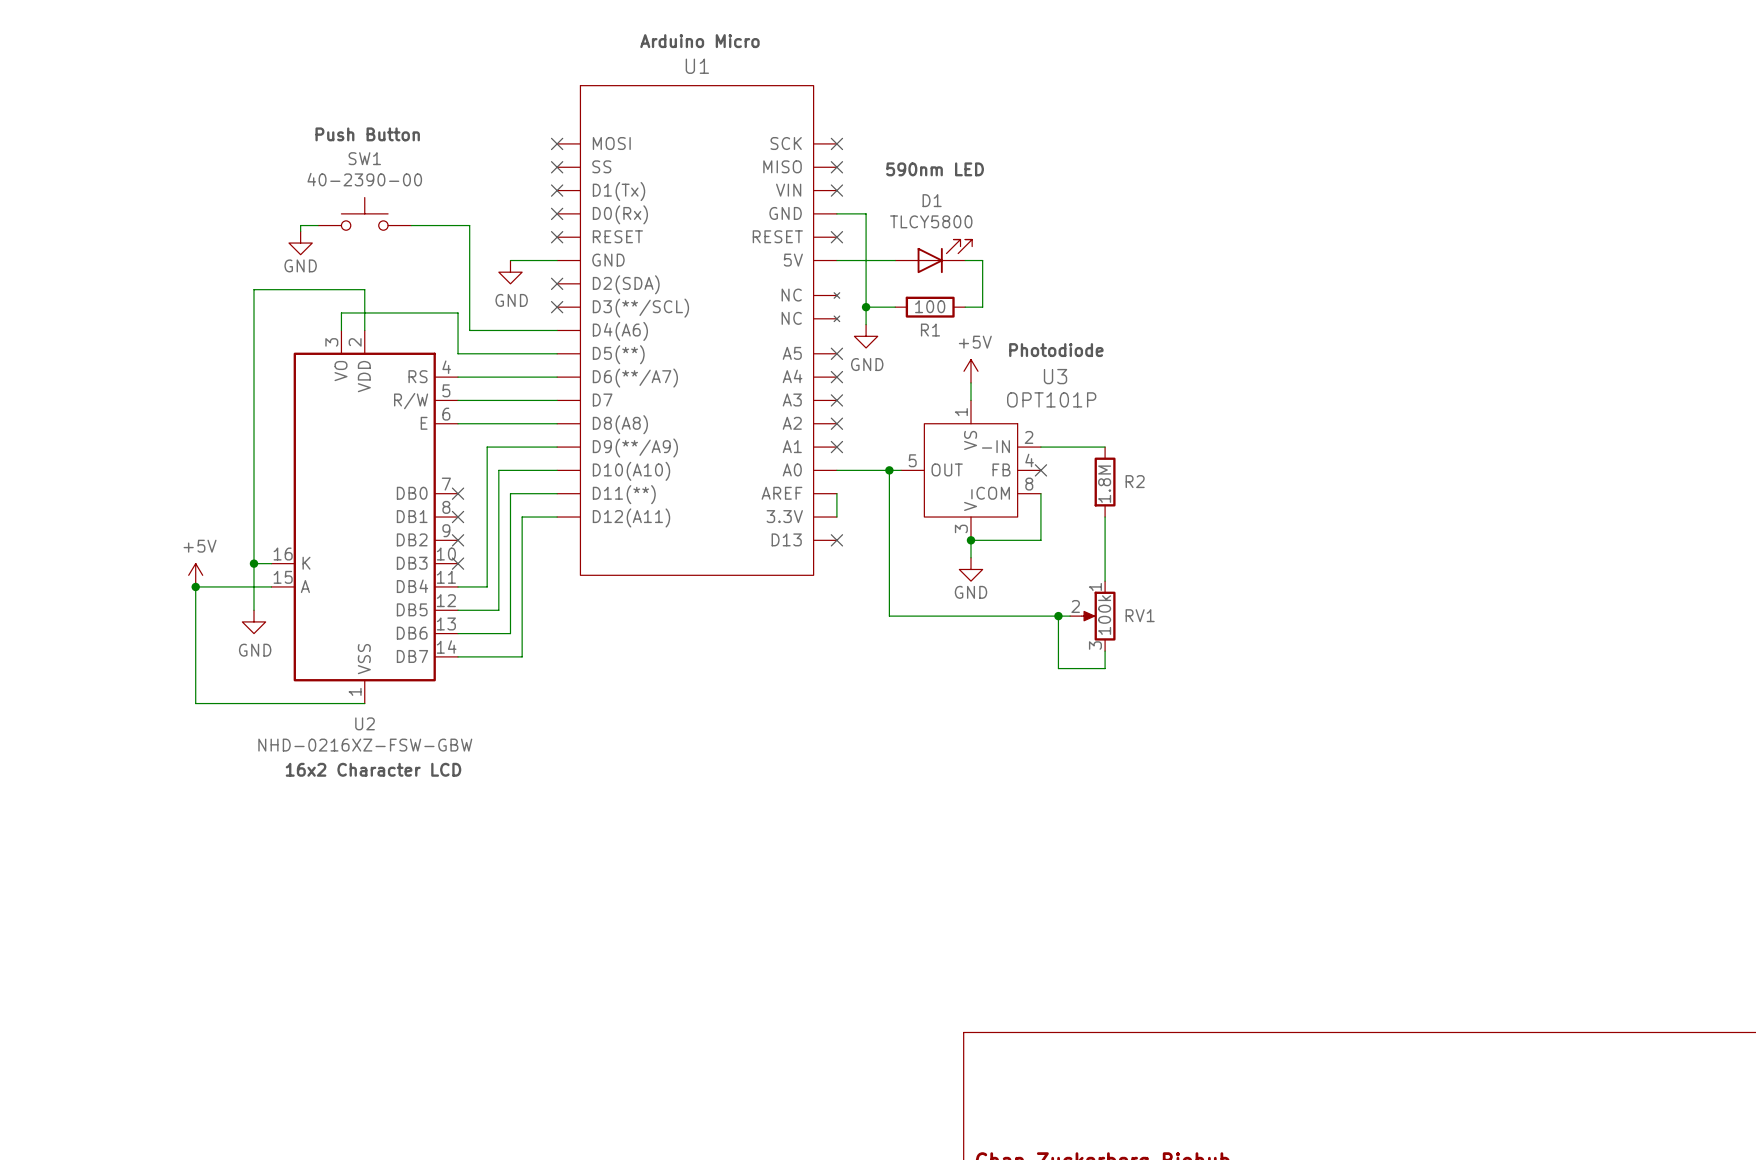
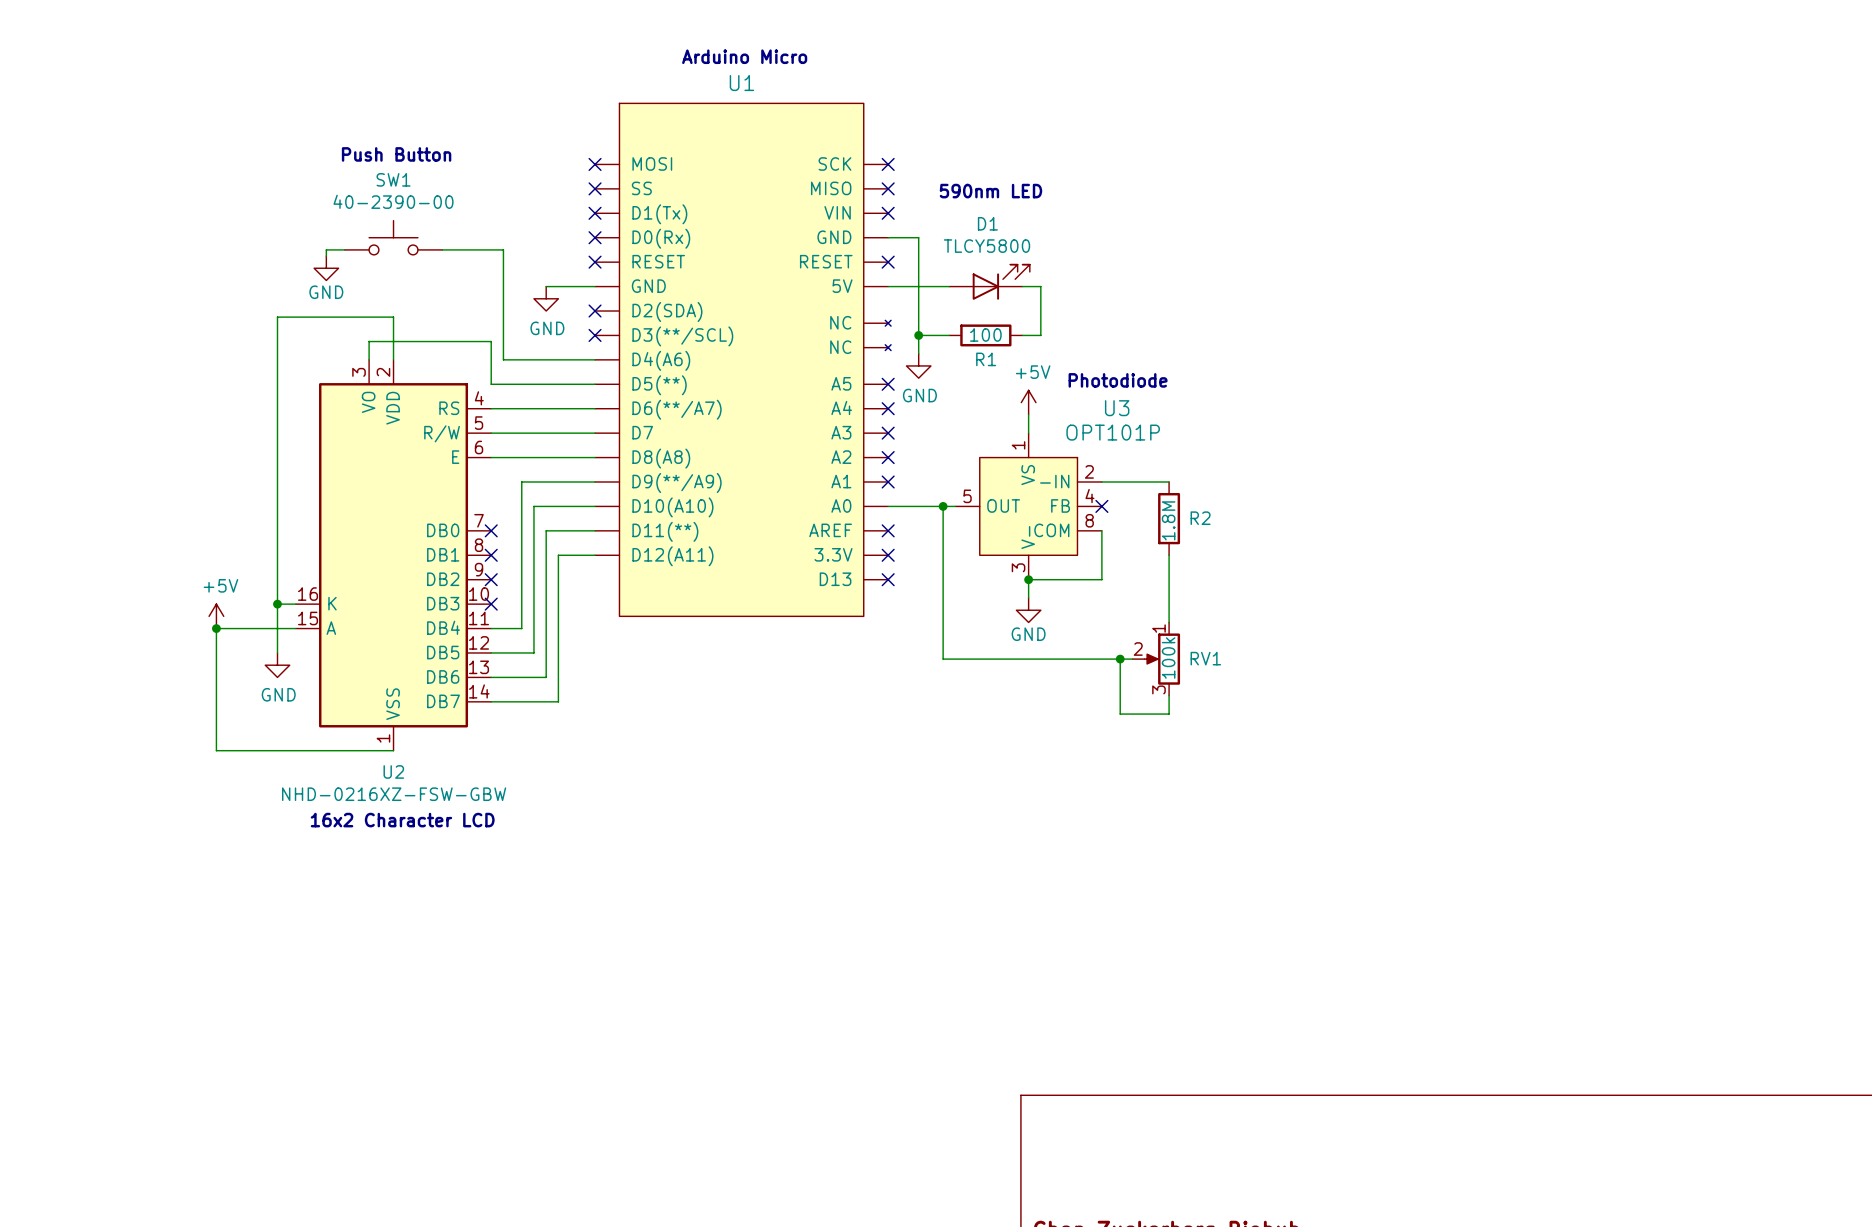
wire: (836, 493) (836, 517) -> none
no-connect mark: none -> (888, 530)
no-connect mark: none -> (888, 555)

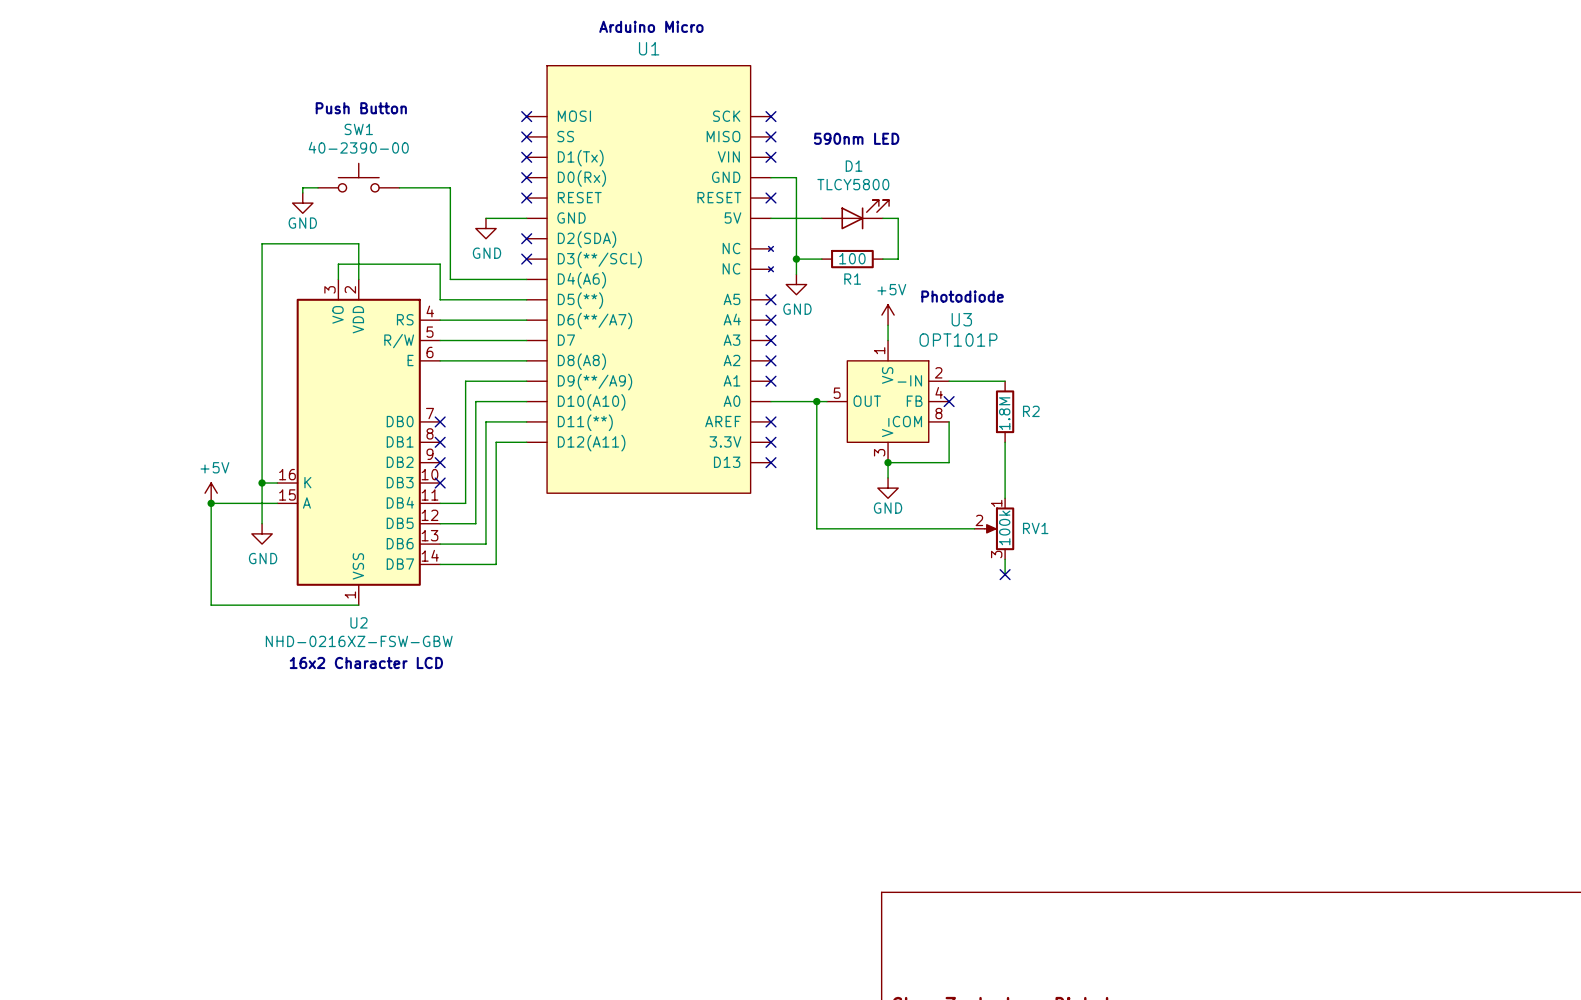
wire: (1120, 659) (1120, 714) (1169, 714) -> none
junction: (1120, 659) -> none
no-connect mark: none -> (1005, 574)

